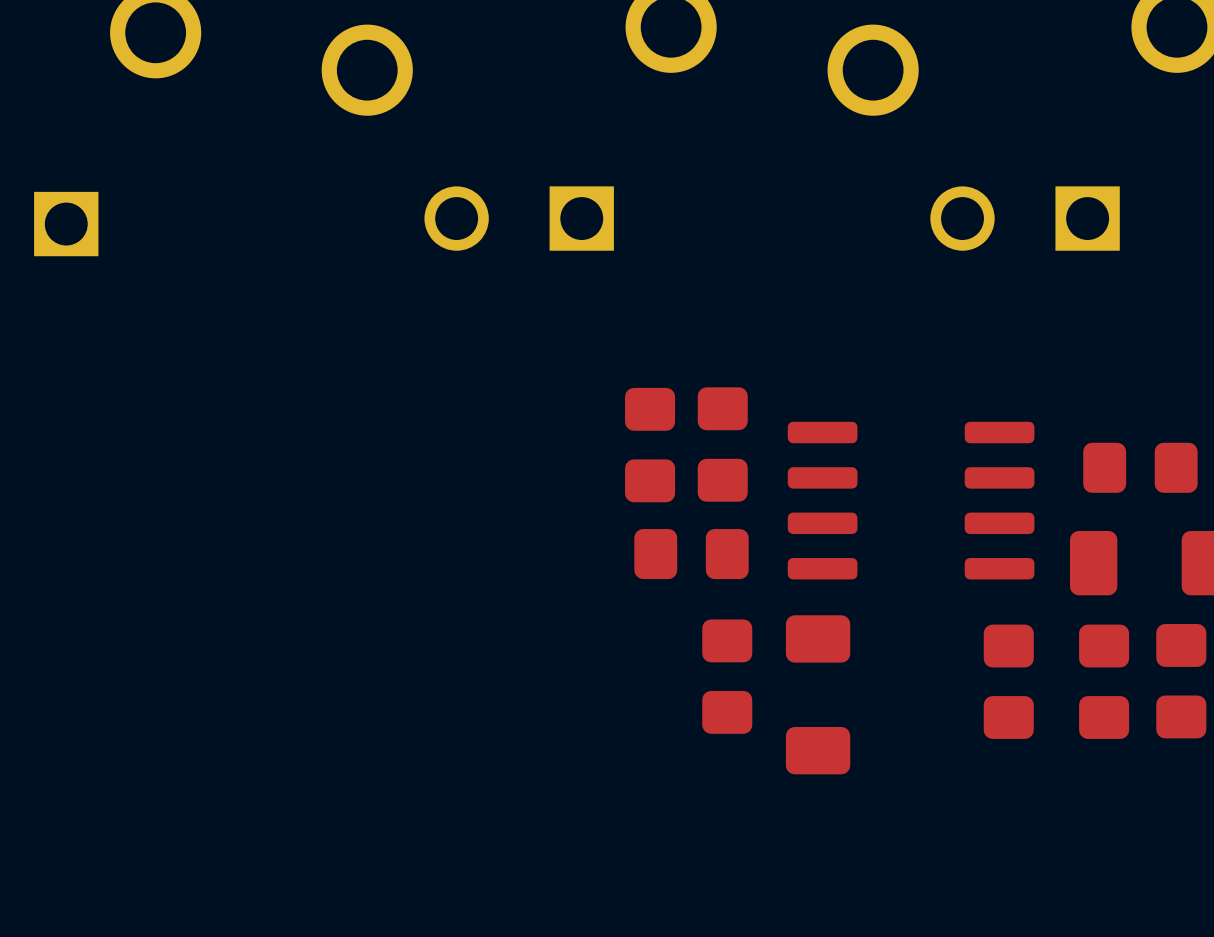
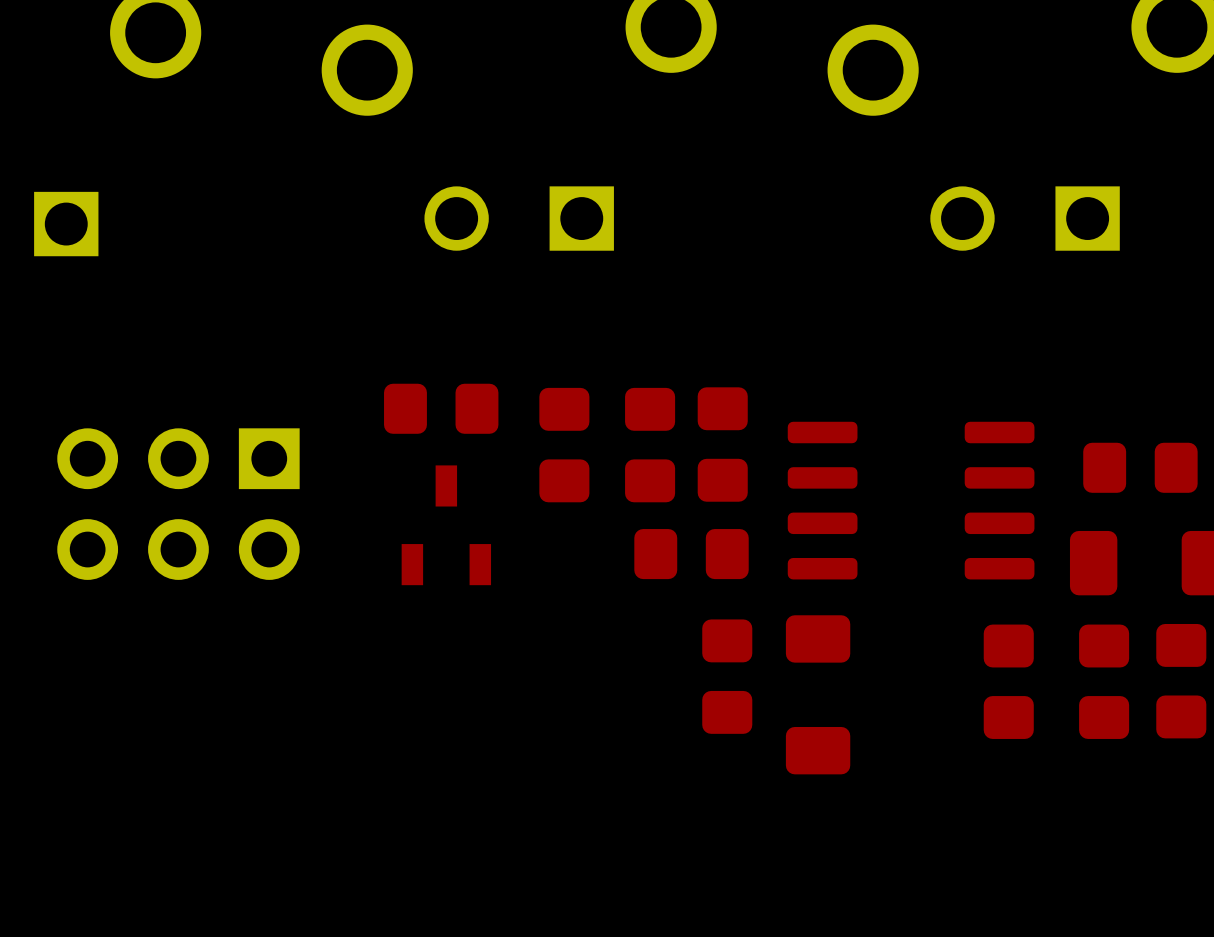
part: none -> (441, 408)
part: none -> (564, 445)
part: none -> (178, 504)
part: none -> (446, 525)

